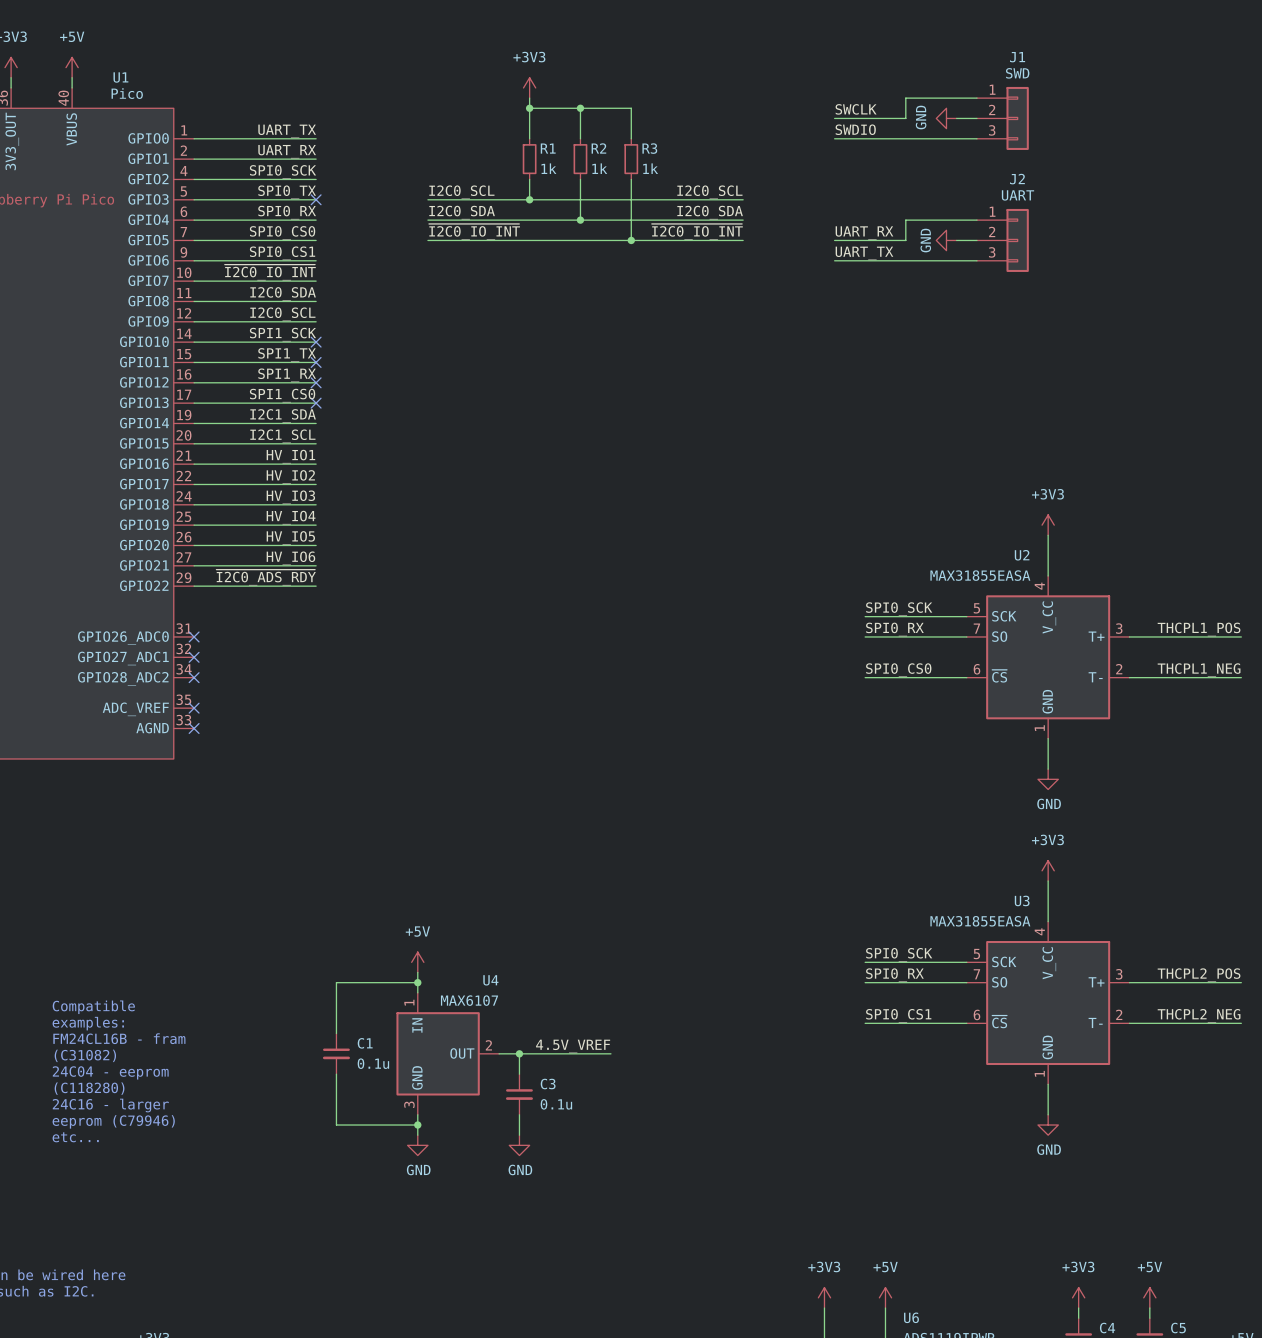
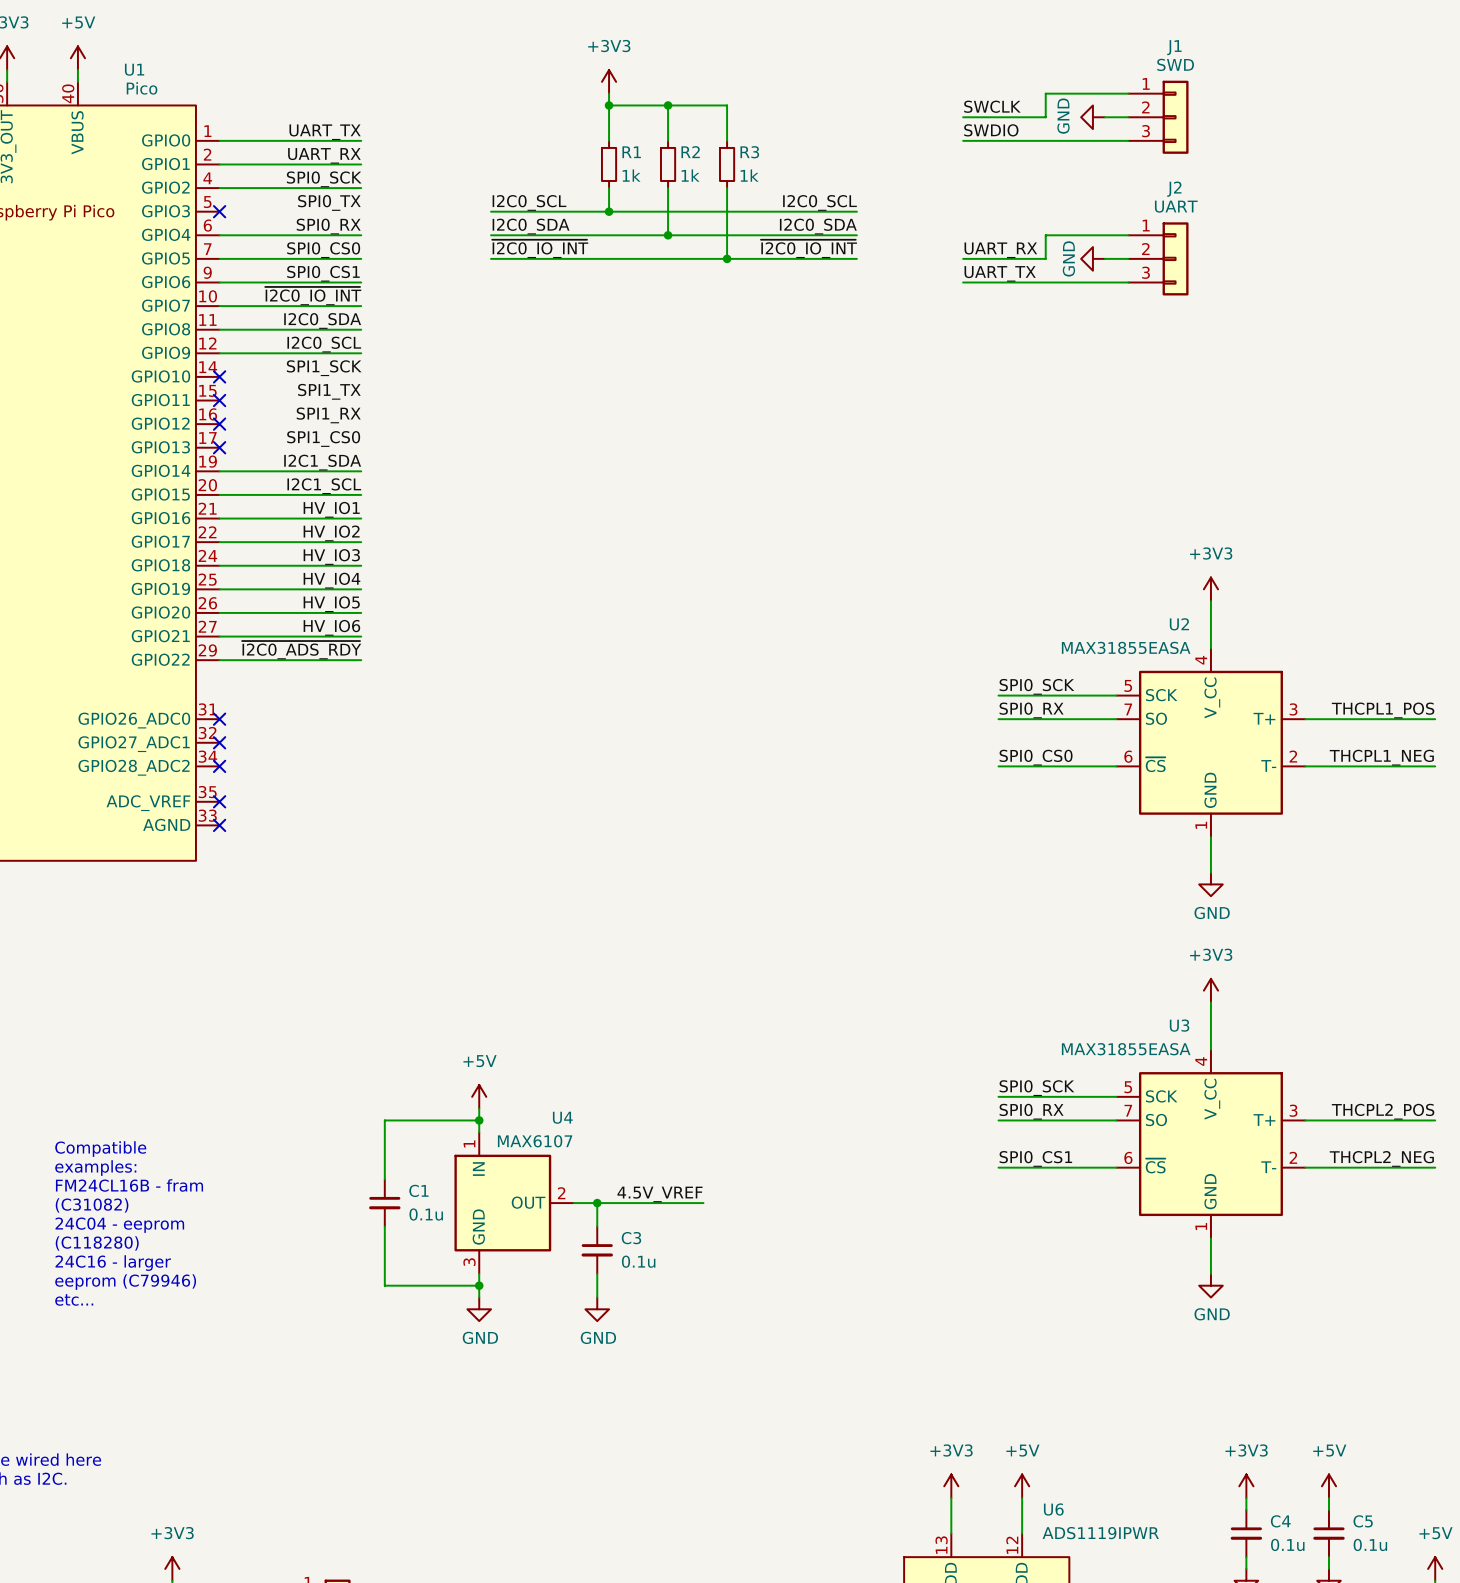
wire: (194, 199) (316, 199) -> none
no-connect mark: none -> (219, 211)
no-connect mark: (316, 199) -> none
wire: (194, 342) (316, 342) -> none
no-connect mark: none -> (219, 376)
no-connect mark: (316, 342) -> none
wire: (194, 362) (316, 362) -> none
no-connect mark: none -> (219, 400)
no-connect mark: (316, 362) -> none
wire: (194, 382) (316, 382) -> none
no-connect mark: none -> (219, 424)
no-connect mark: (316, 382) -> none
wire: (194, 403) (316, 403) -> none
no-connect mark: none -> (219, 447)
no-connect mark: (316, 403) -> none

